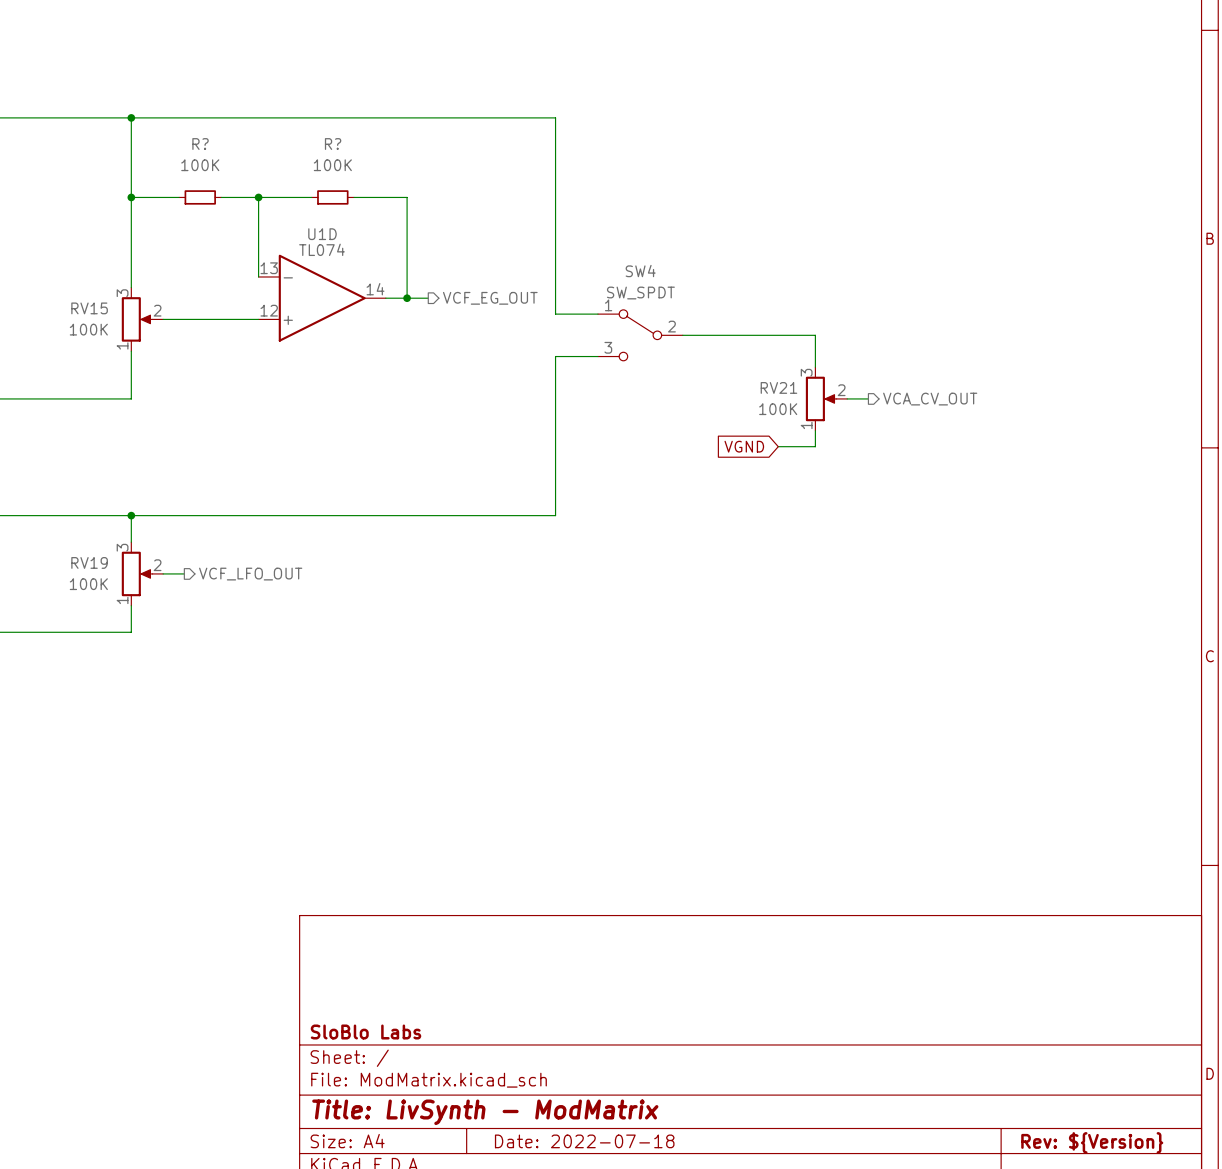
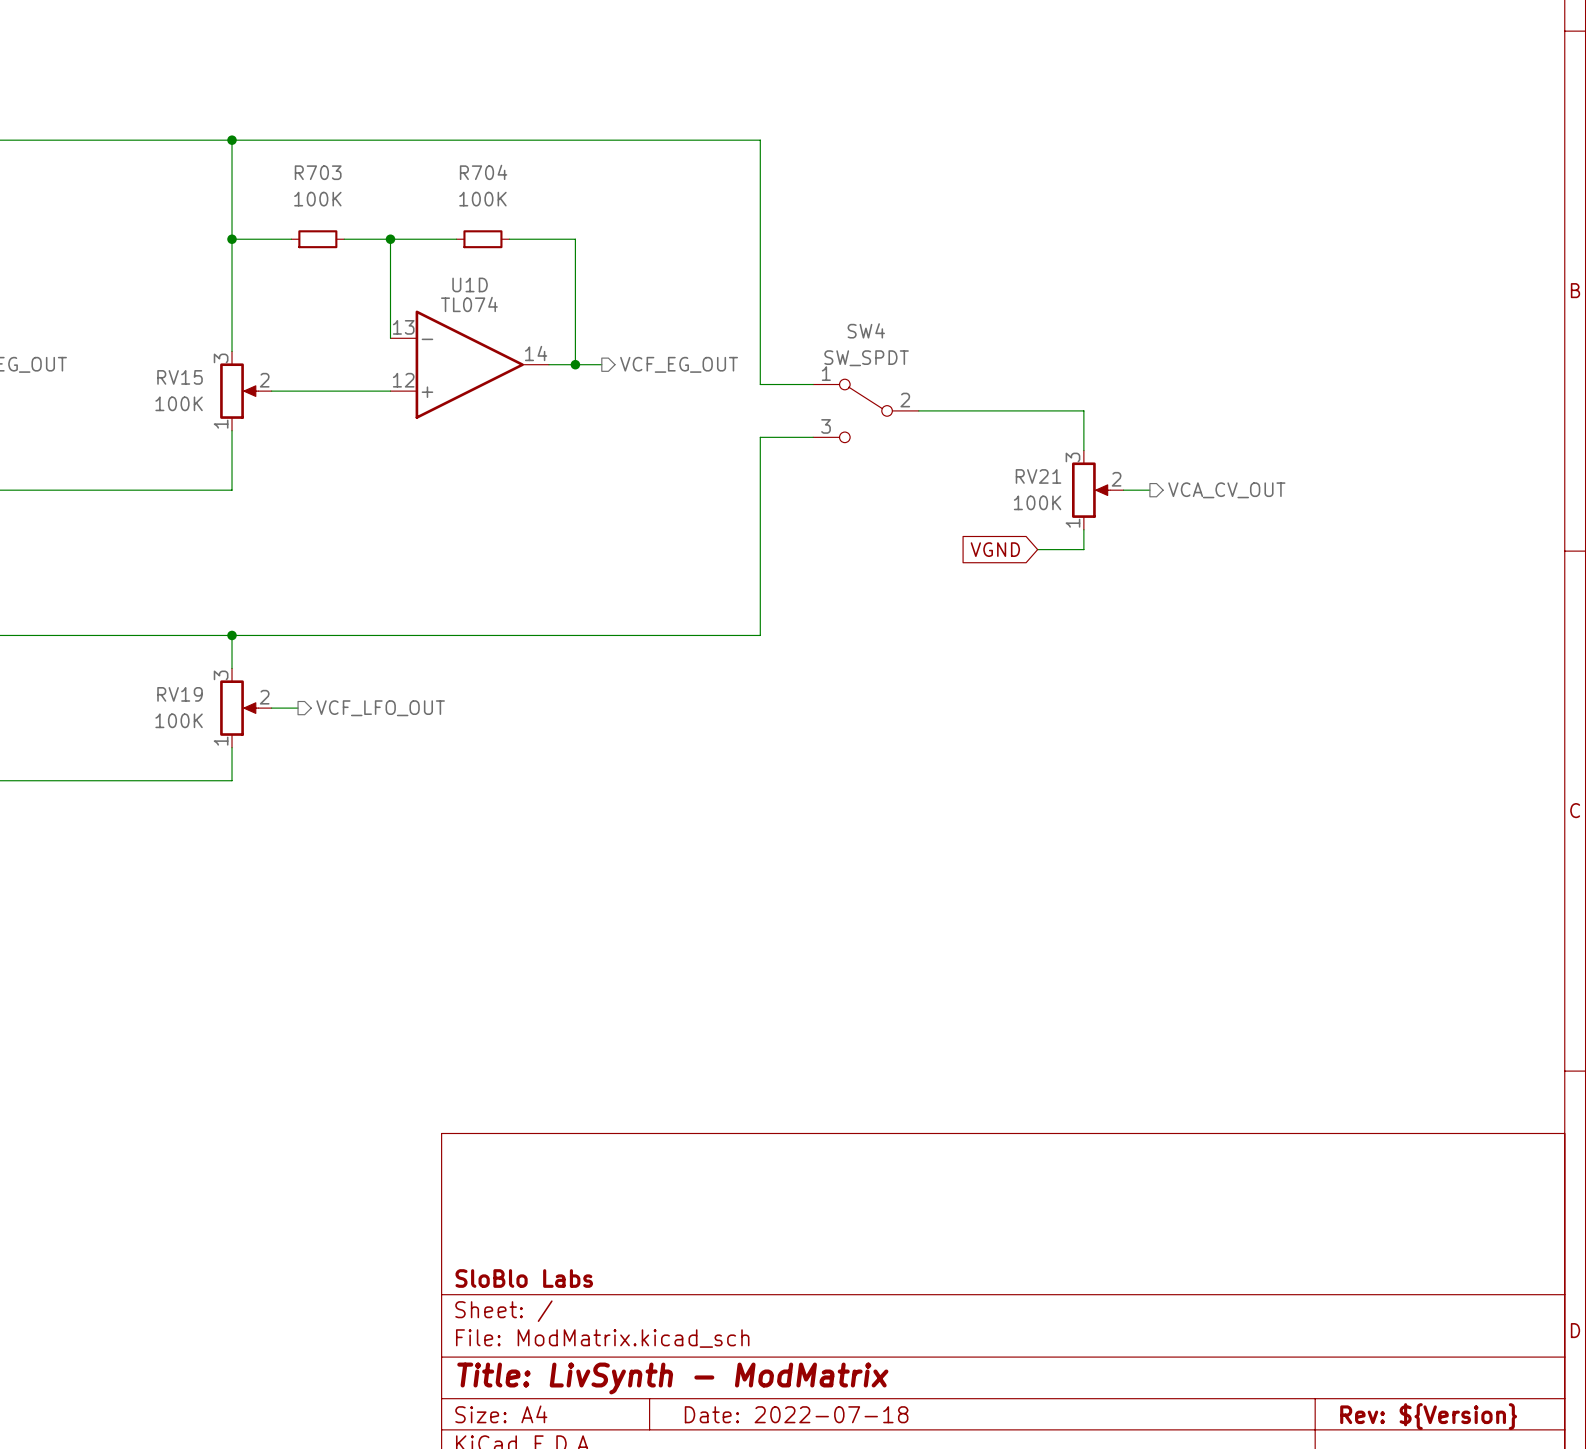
R? name: R? (200, 144) -> R703 (318, 172)
R? name: R? (333, 144) -> R704 (483, 172)

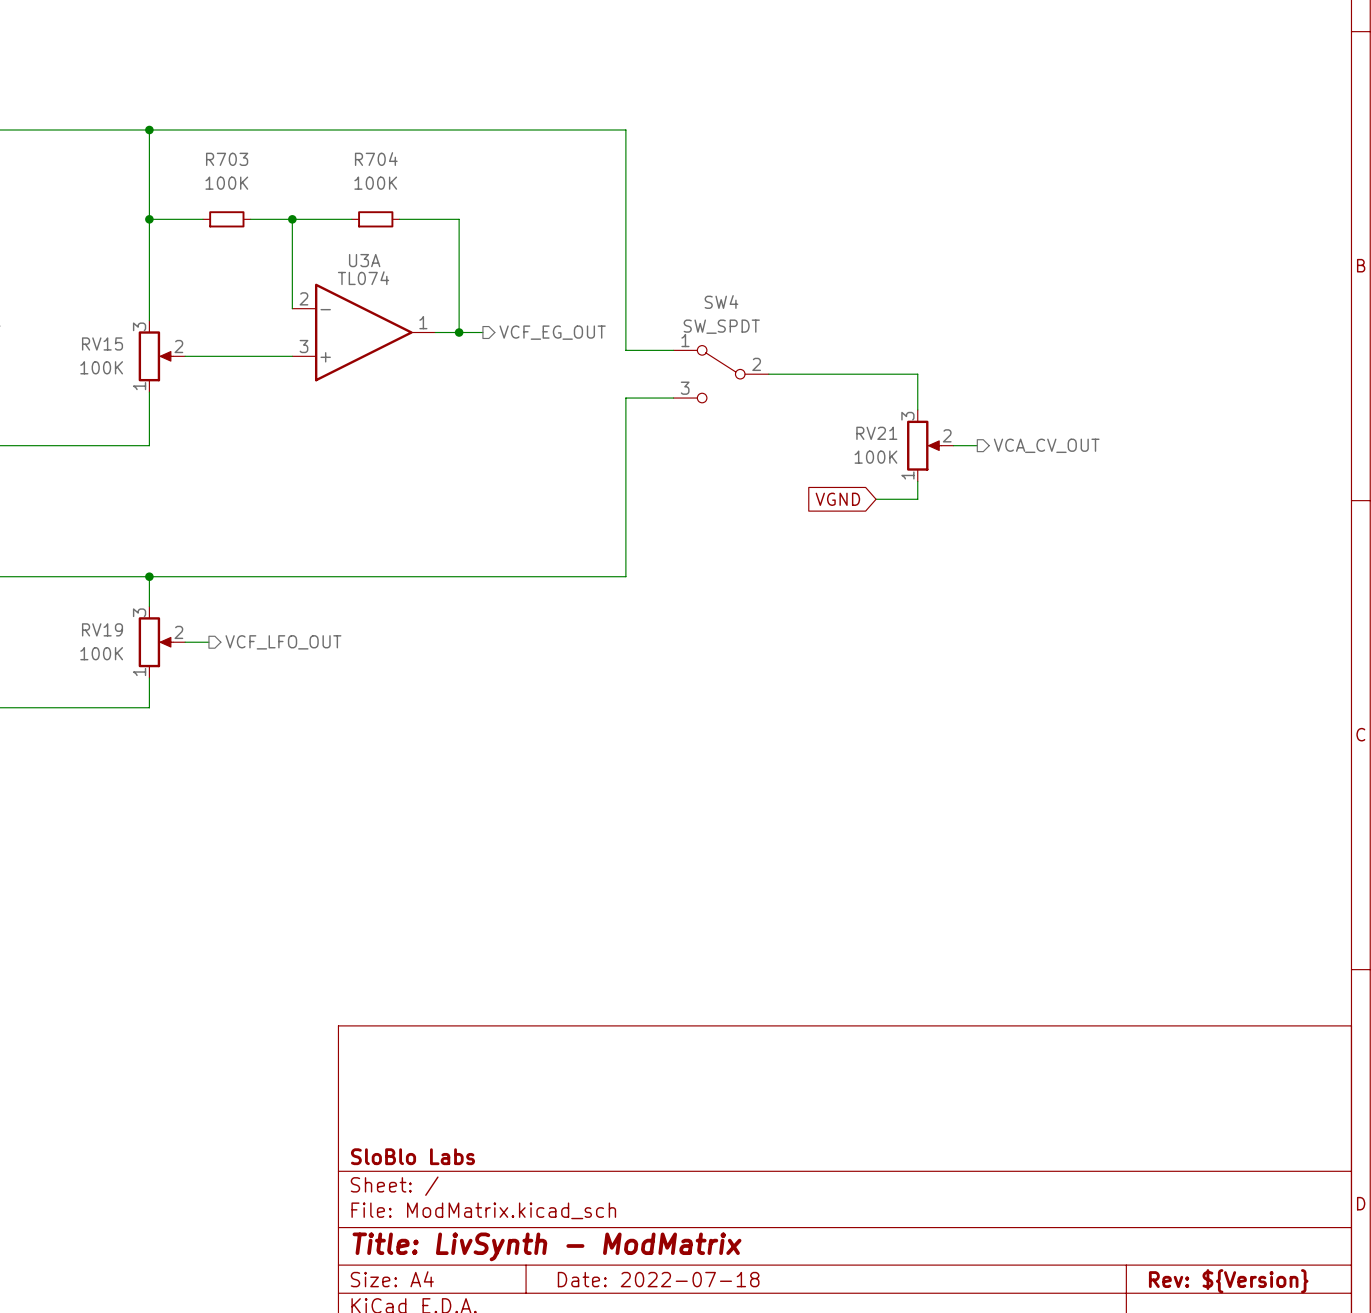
U1D name: U1D (470, 284) -> U3A (364, 260)
U1D pin number: 13 (403, 327) -> 2 (303, 298)
U1D pin number: 14 (536, 353) -> 1 (423, 322)
U1D pin number: 12 (403, 380) -> 3 (303, 346)

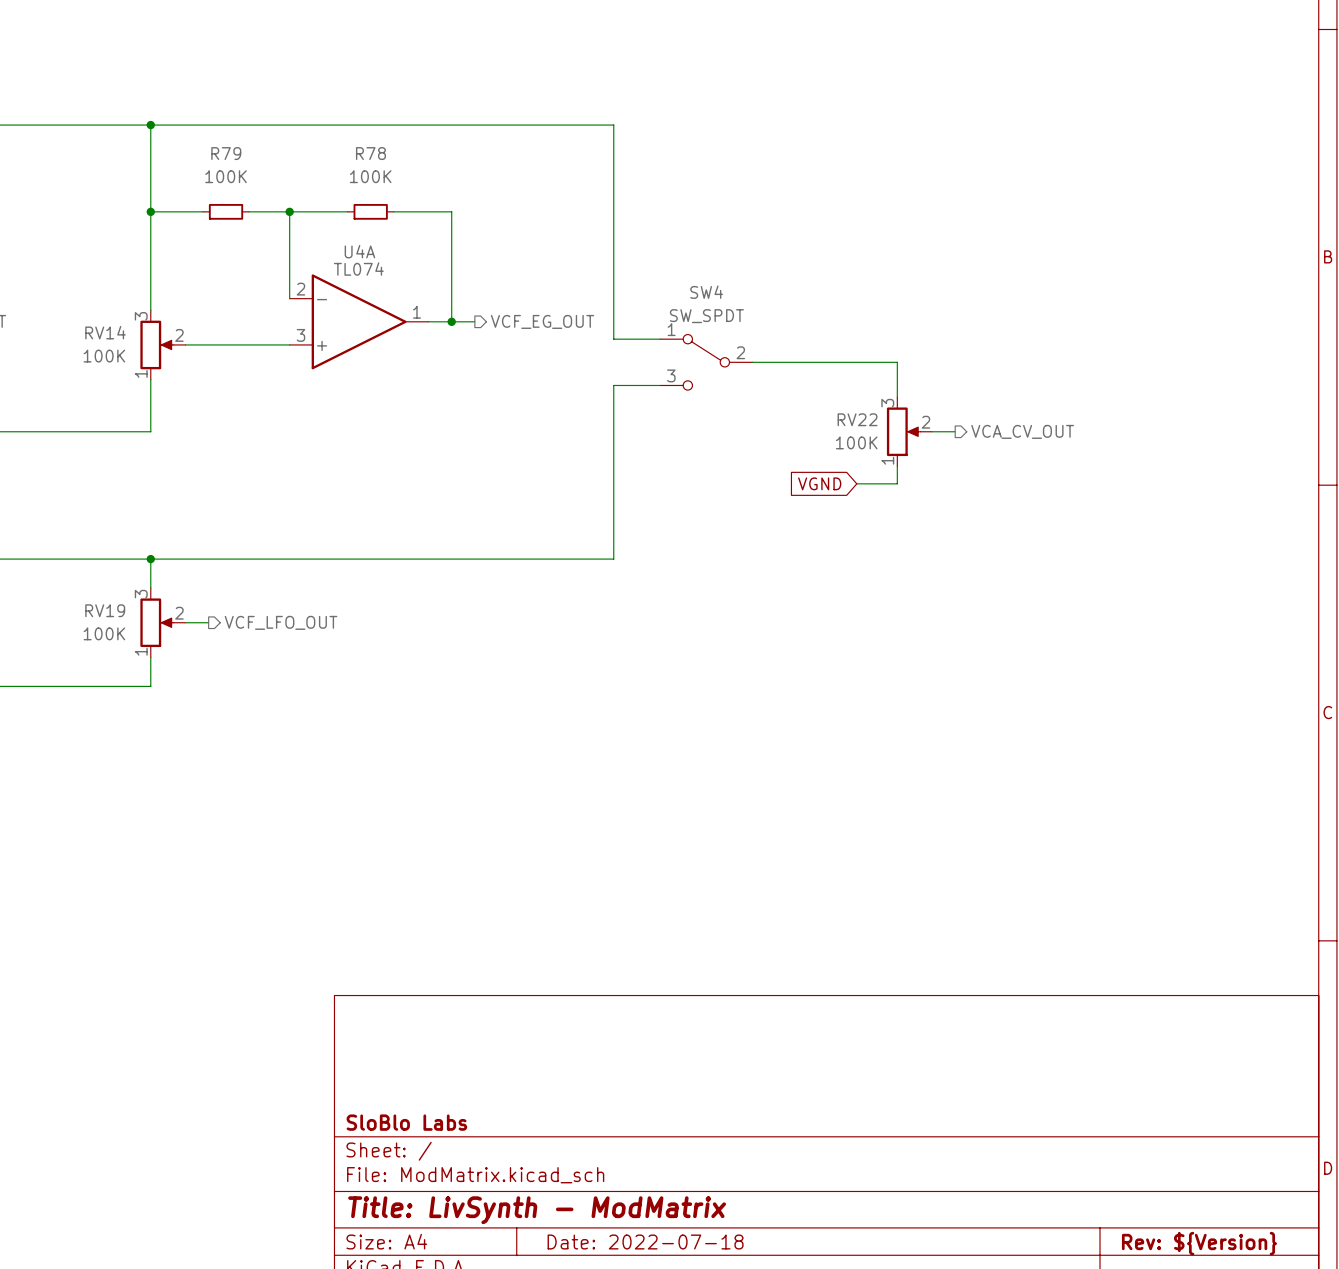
R703 name: R703 (227, 159) -> R79 (226, 153)
R704 name: R704 (376, 159) -> R78 (370, 153)
U3A name: U3A (364, 260) -> U4A (359, 251)
RV15 name: RV15 (102, 343) -> RV14 (105, 332)
RV21 name: RV21 (876, 433) -> RV22 (857, 419)

